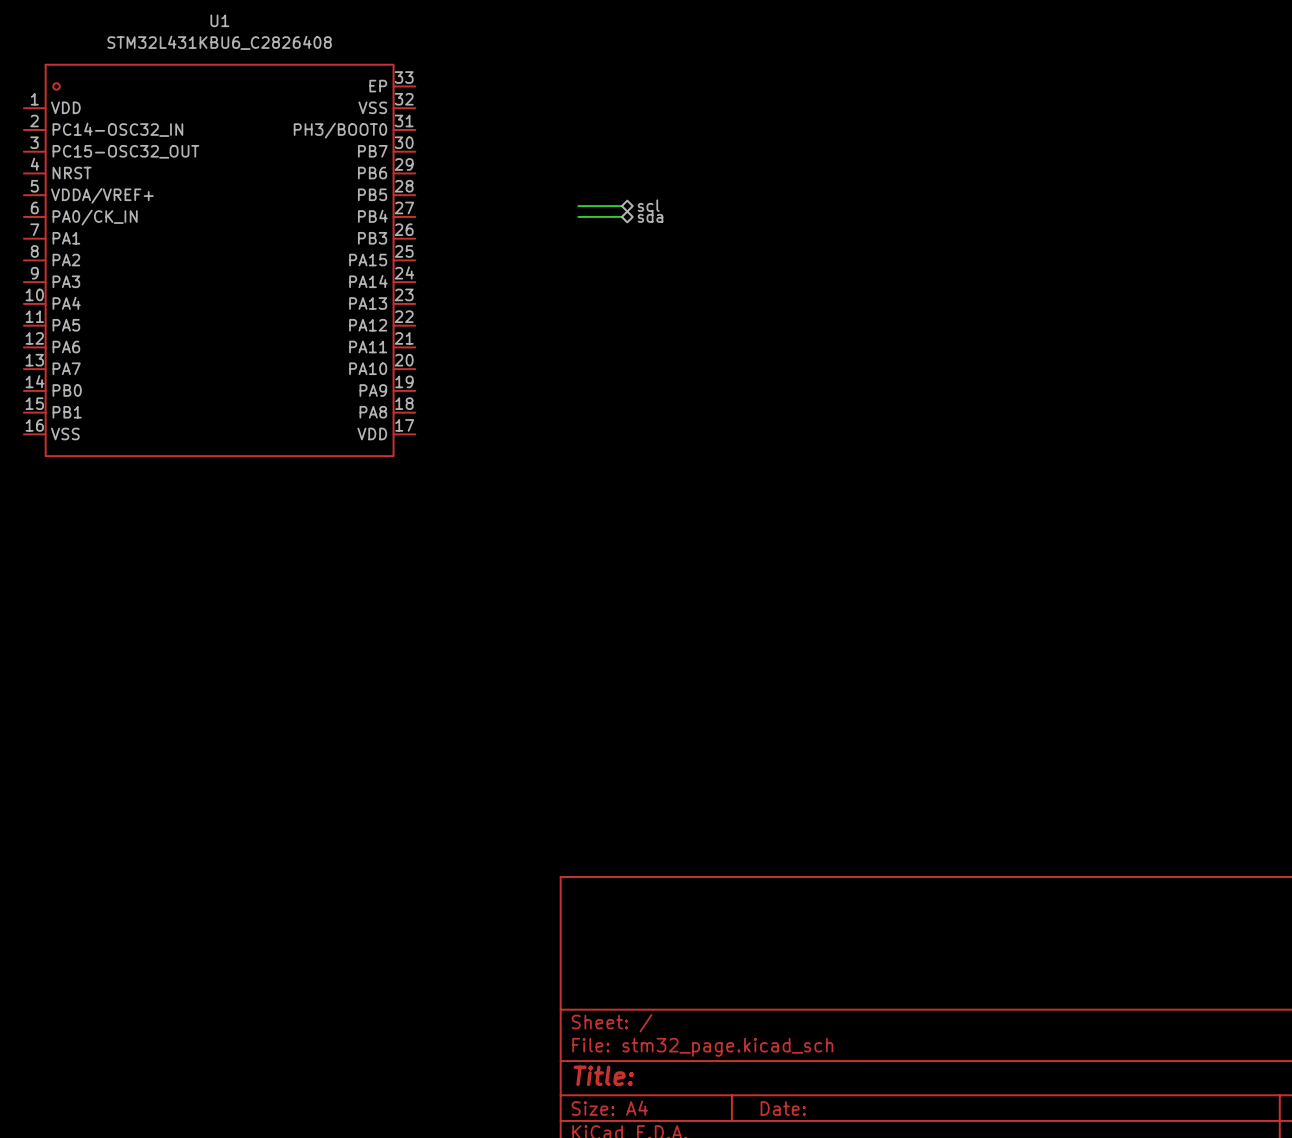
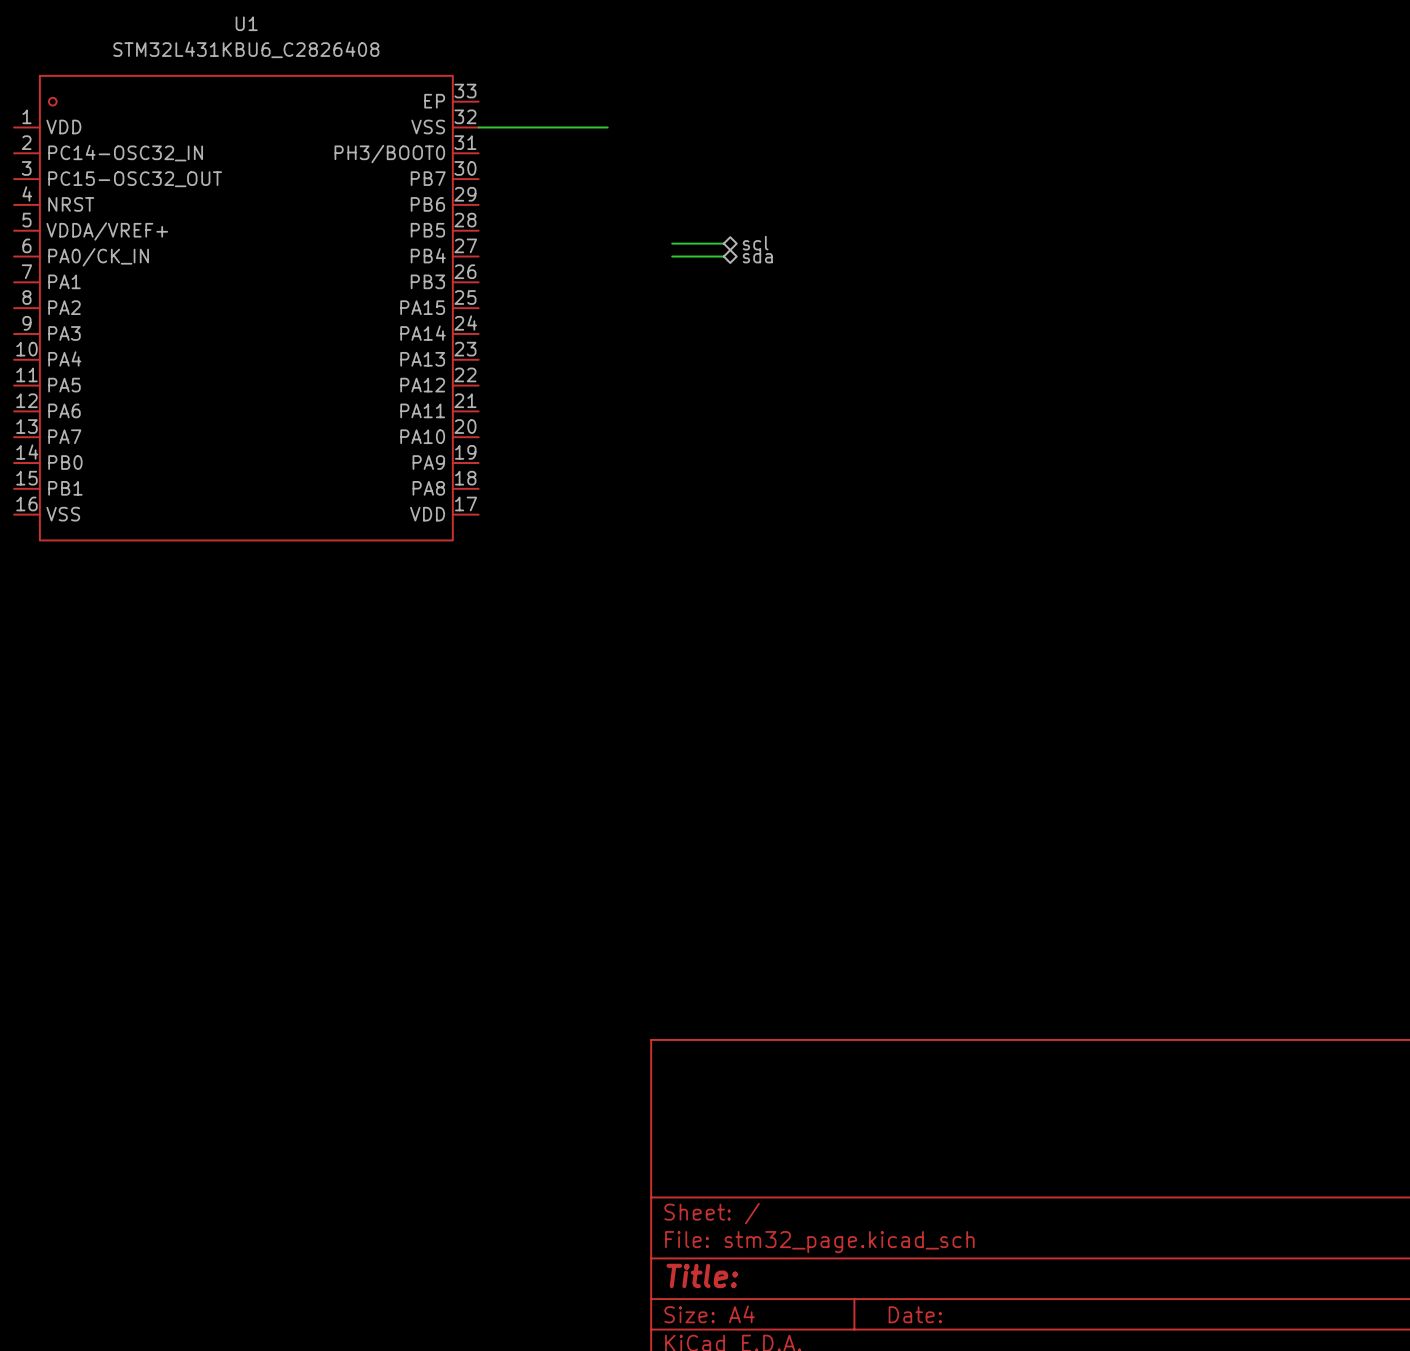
wire: none -> (478, 127) (607, 127)

